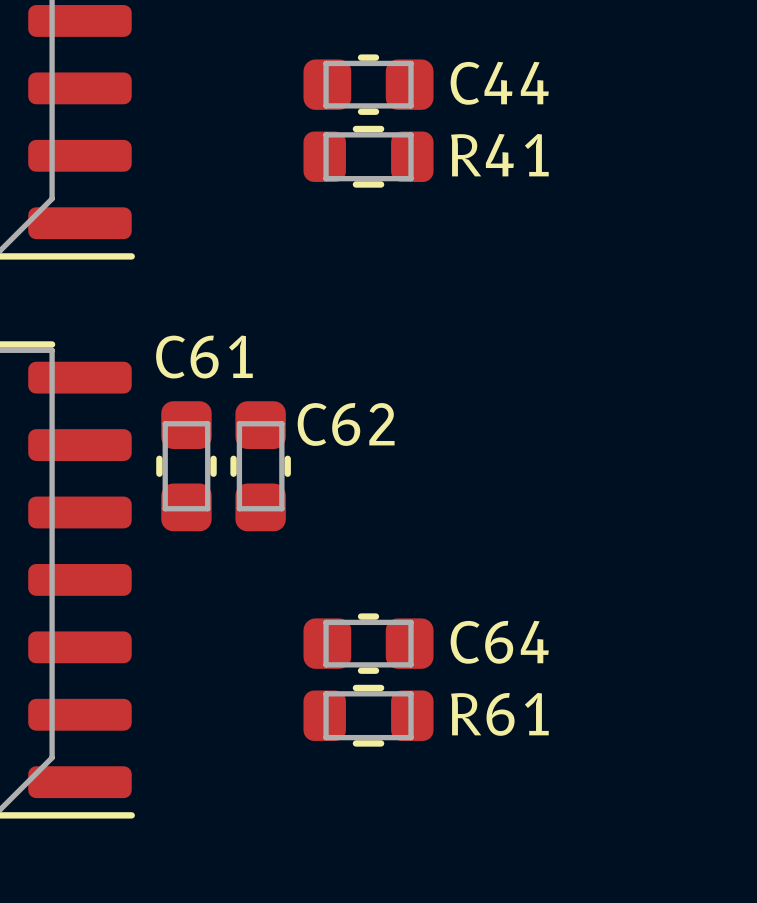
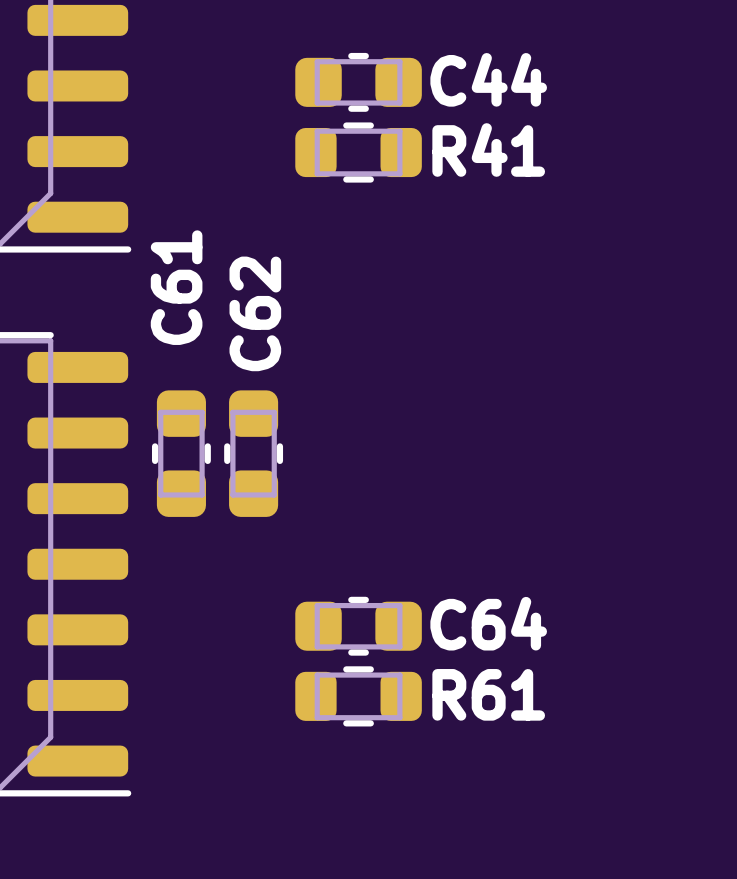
C61 name rotation: 0° (204, 357) -> 90° counterclockwise (176, 287)
C62 name rotation: 0° (346, 424) -> 90° counterclockwise (255, 313)

